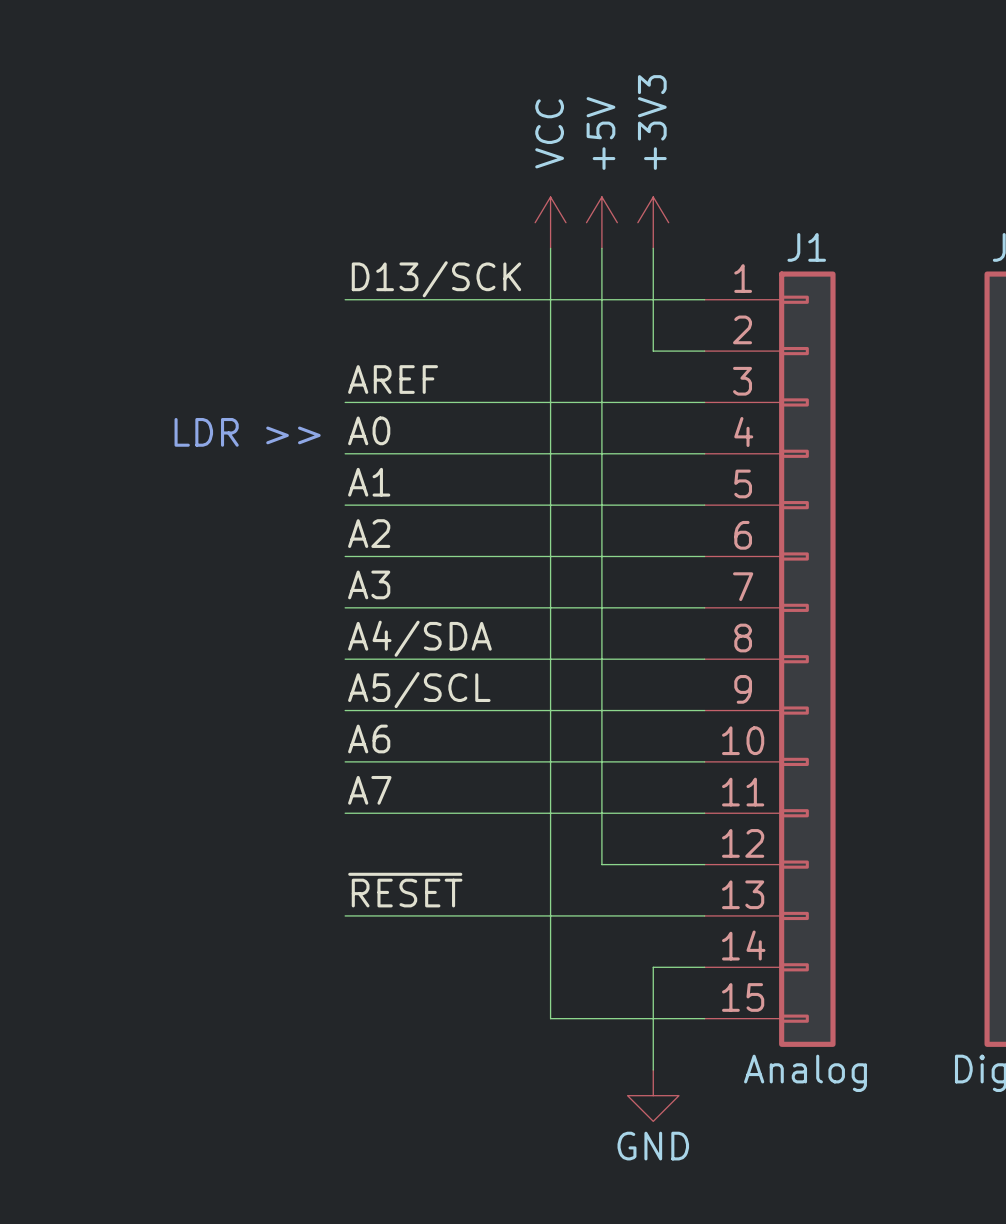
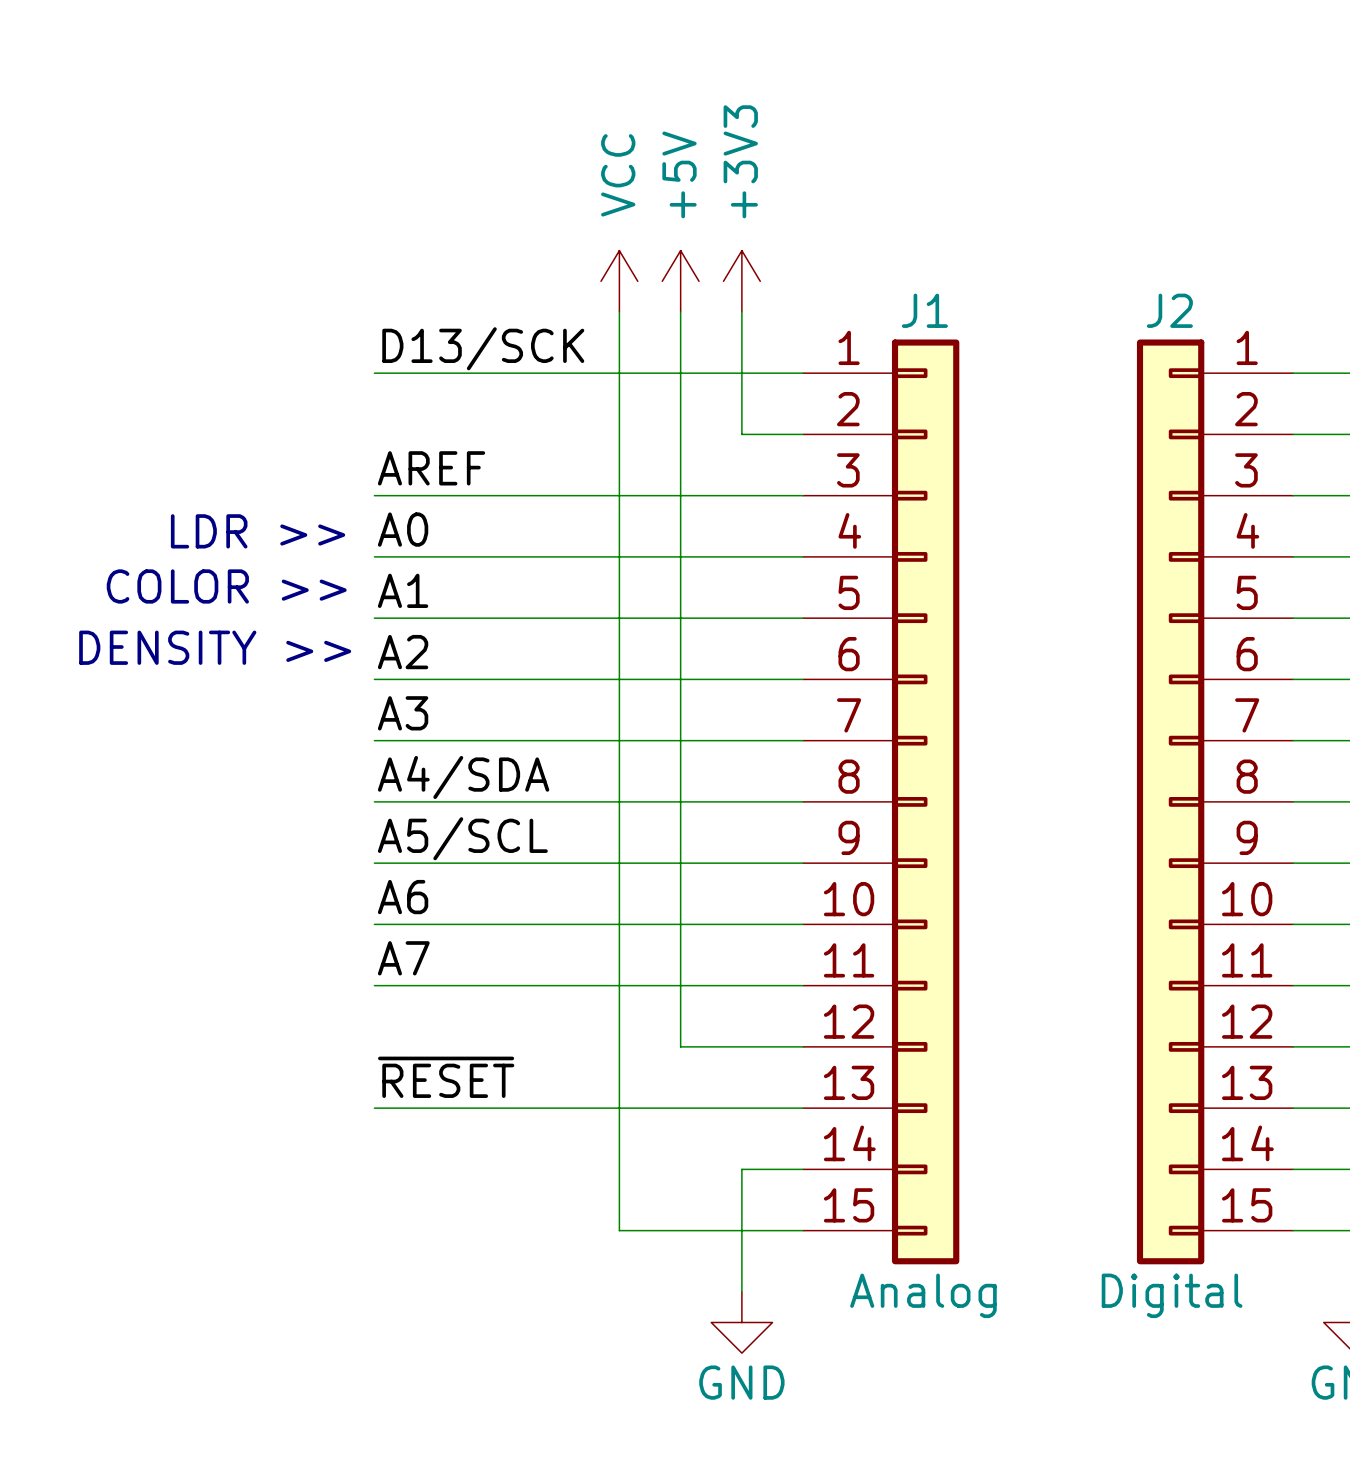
text: none -> COLOR >> (226, 586)
text: none -> DENSITY >> (215, 647)

